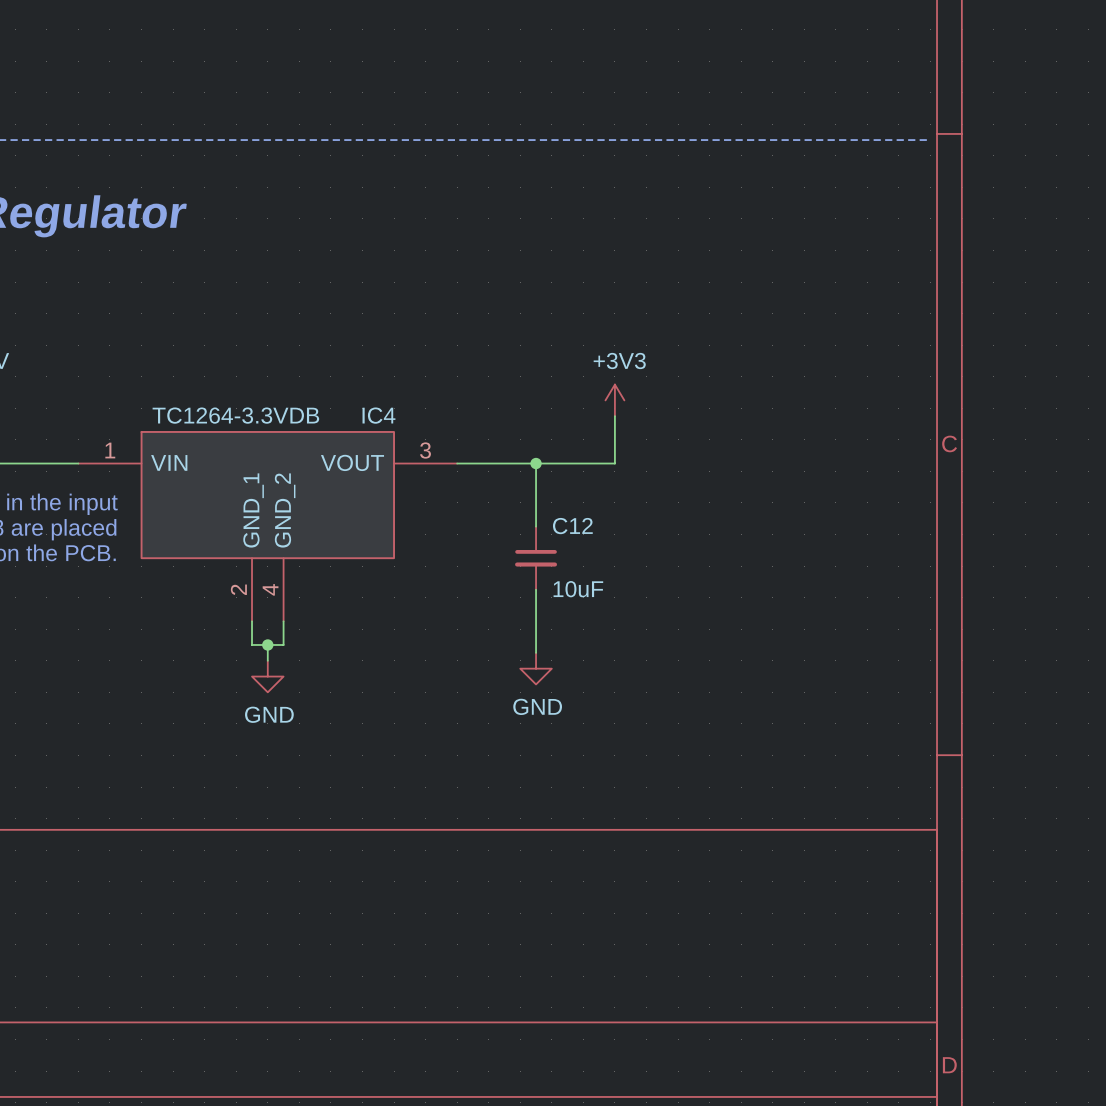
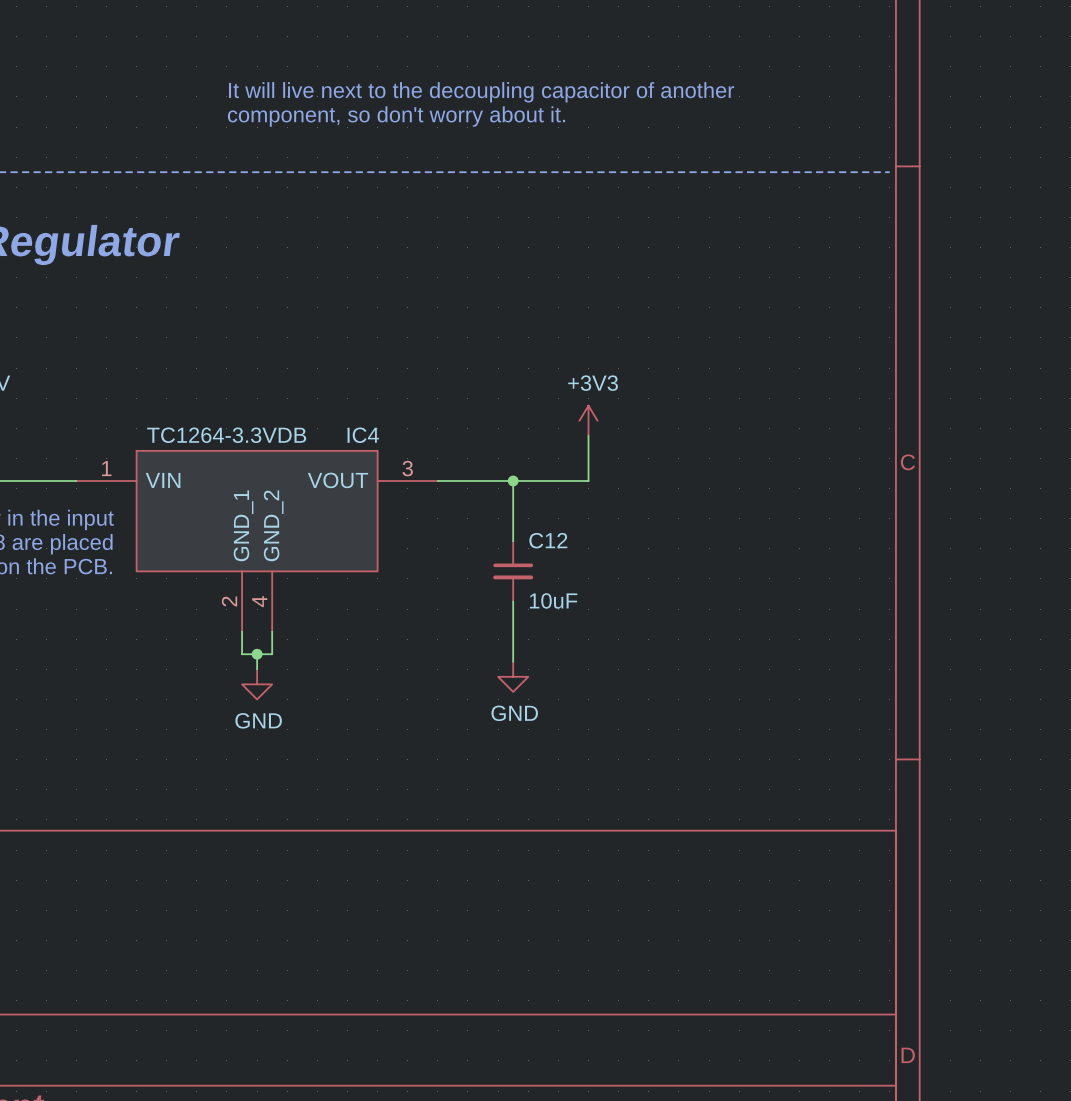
text: none -> It will live next to the decoupling capacitor of another (481, 92)
text: none -> component, so don't worry about it. (396, 116)

